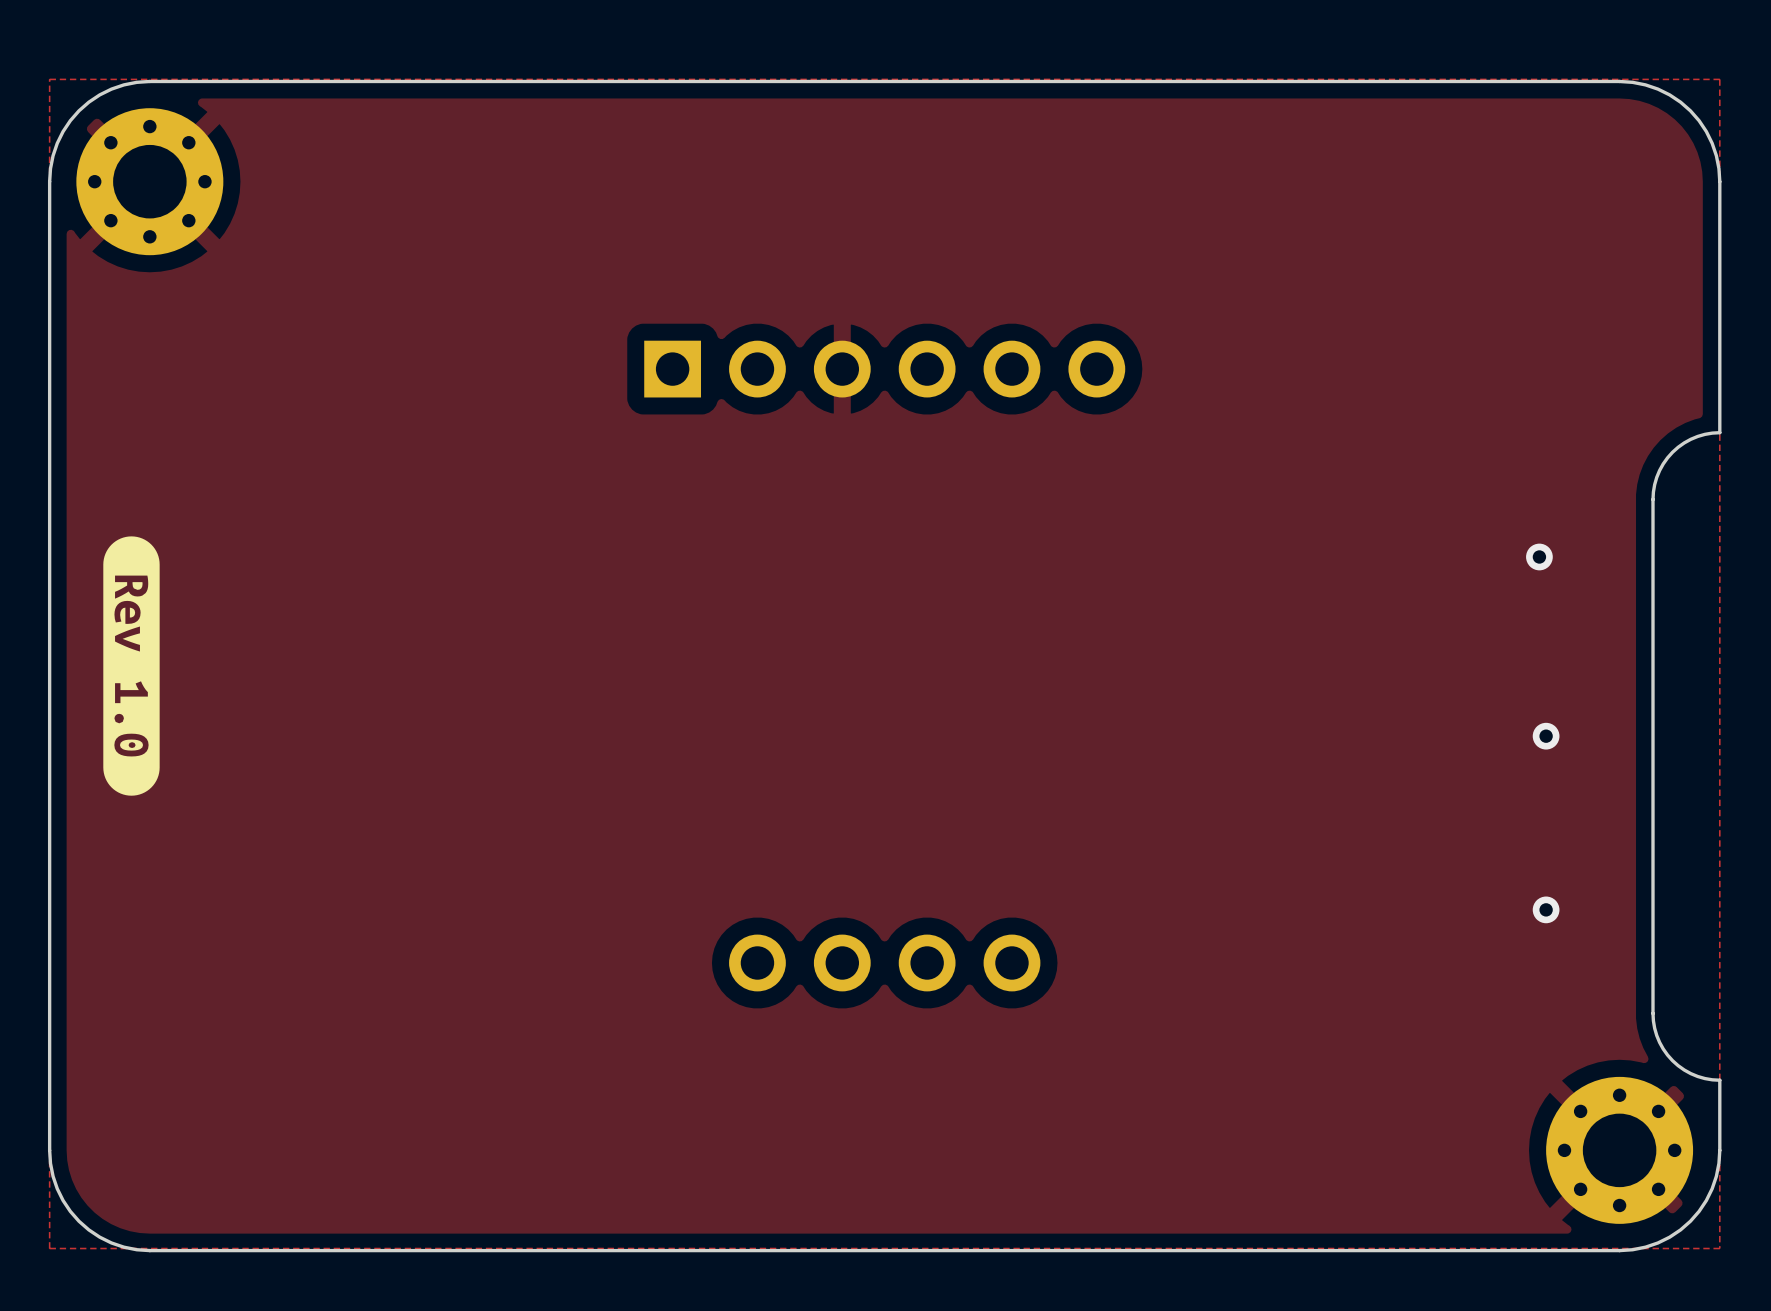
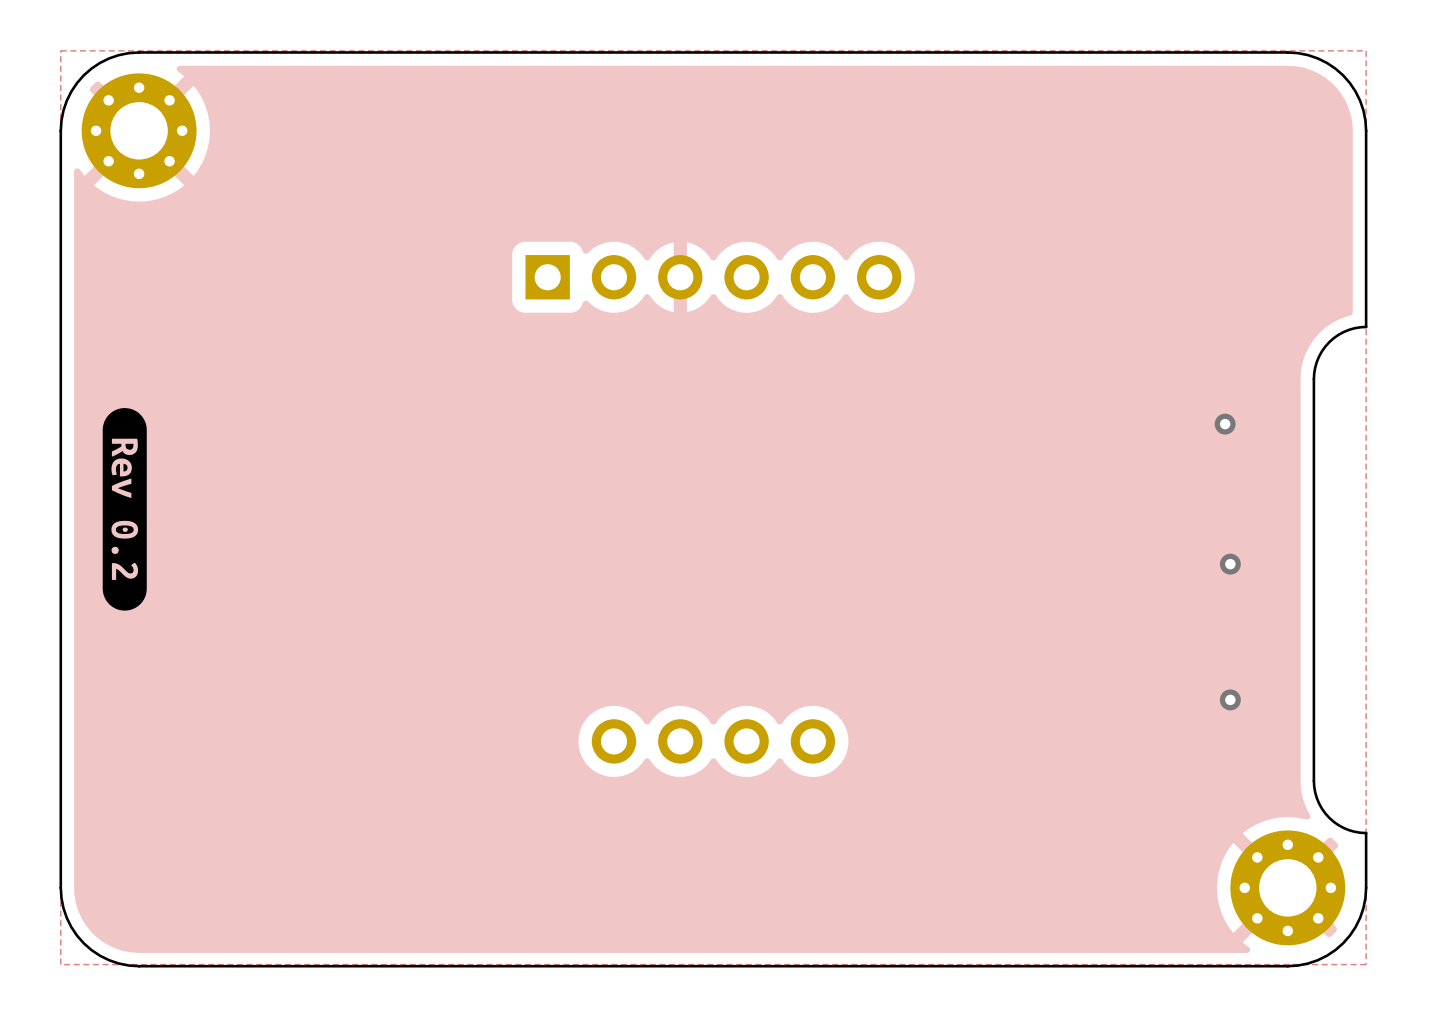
drawing shape: [103, 536, 160, 796] -> [102, 408, 147, 611]

